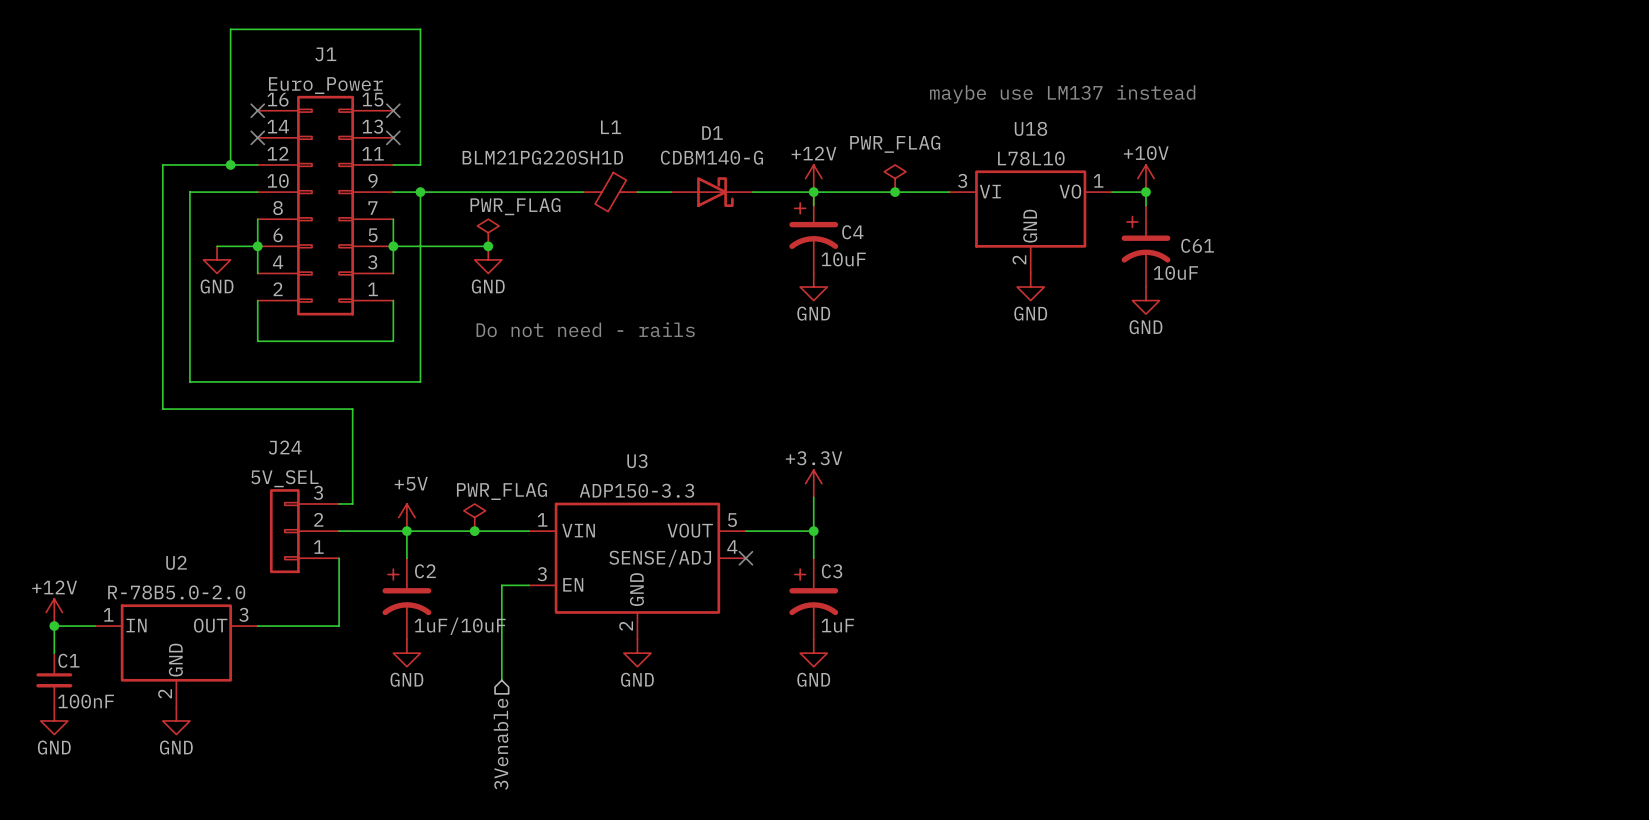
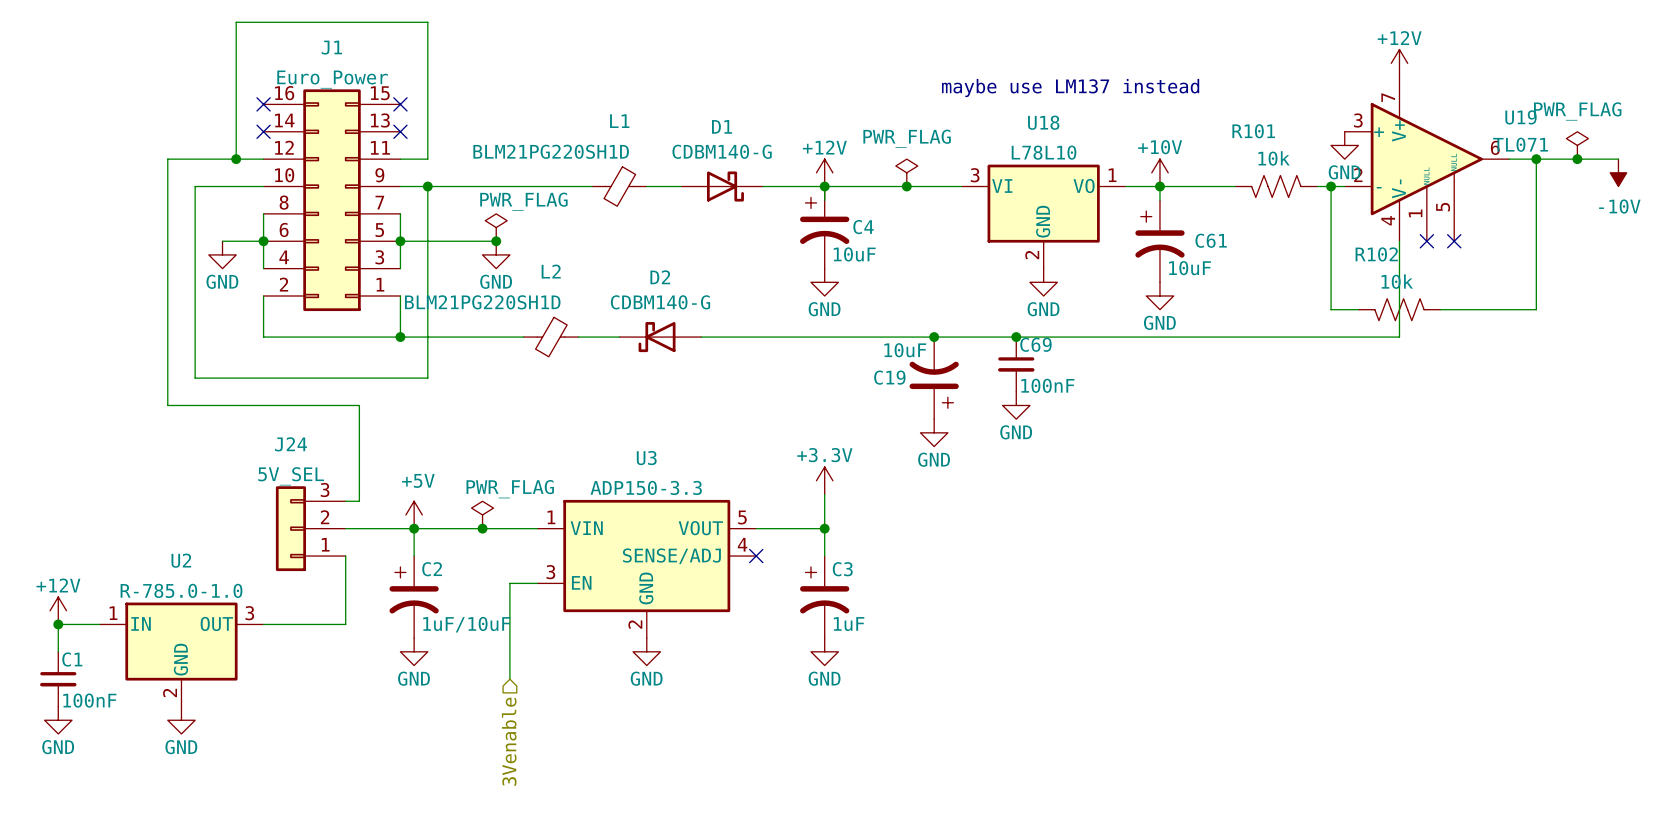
power symbol: none -> +12V (1399, 63)
power symbol: none -> GND (1344, 145)
power symbol: none -> PWR_FLAG (1577, 145)
U19: none -> TL071 (1426, 159)
wire: none -> (1508, 159) (1618, 159)
wire: none -> (1536, 159) (1536, 309) (1440, 309)
junction: none -> (1536, 159)
junction: none -> (1577, 159)
power symbol: none -> -10V (1618, 172)
wire: none -> (1159, 186) (1235, 186)
R101: none -> 10k (1276, 186)
wire: none -> (1317, 186) (1344, 186)
wire: none -> (1331, 186) (1331, 309) (1358, 309)
junction: none -> (1331, 186)
wire: none -> (1399, 241) (1399, 337) (701, 337)
no-connect mark: none -> (1426, 241)
no-connect mark: none -> (1454, 241)
R102: none -> 10k (1399, 309)
text: Do not need - rails (585, 329) -> none
wire: none -> (400, 337) (523, 337)
junction: none -> (400, 337)
L2: none -> BLM21PG220SH1D (550, 337)
wire: none -> (578, 337) (619, 337)
D2: none -> CDBM140-G (660, 337)
junction: none -> (934, 337)
junction: none -> (1016, 337)
C69: none -> 100nF (1016, 364)
C19: none -> 10uF (934, 378)
power symbol: none -> GND (1016, 405)
power symbol: none -> GND (934, 432)
U2 value: R-78B5.0-2.0 (176, 592) -> R-785.0-1.0 (181, 590)

